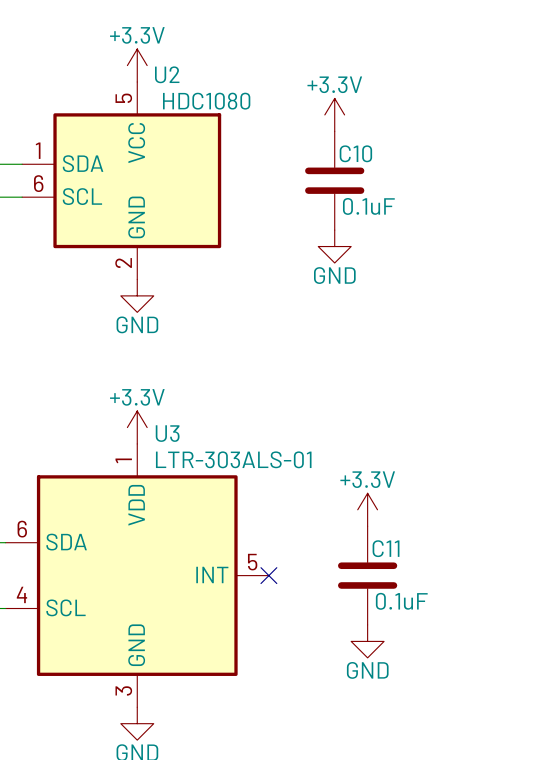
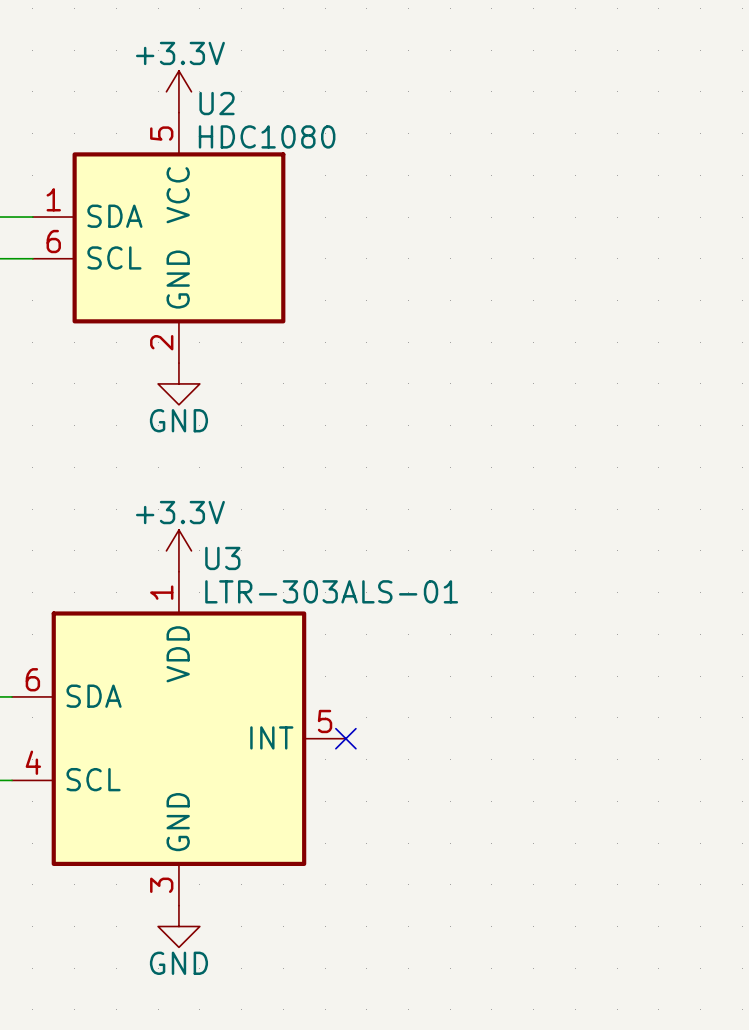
power symbol: +3.3V (334, 114) -> none
C10: 0.1uF (334, 180) -> none
power symbol: GND (334, 246) -> none
power symbol: +3.3V (367, 509) -> none
C11: 0.1uF (367, 575) -> none
power symbol: GND (367, 641) -> none

